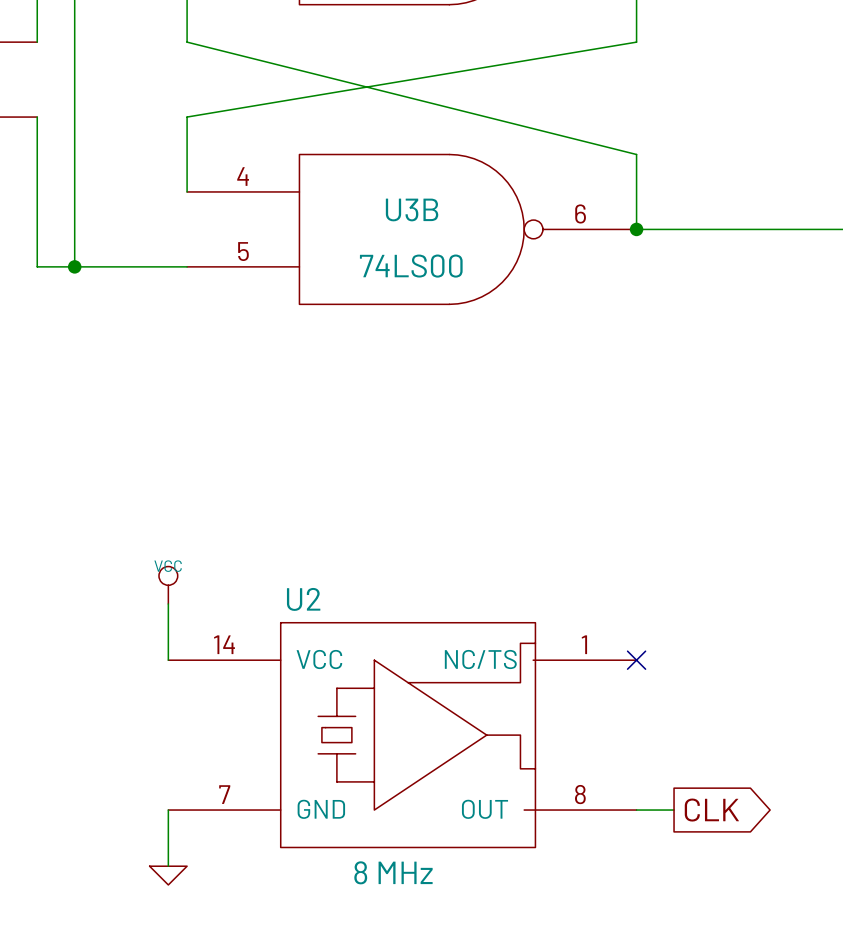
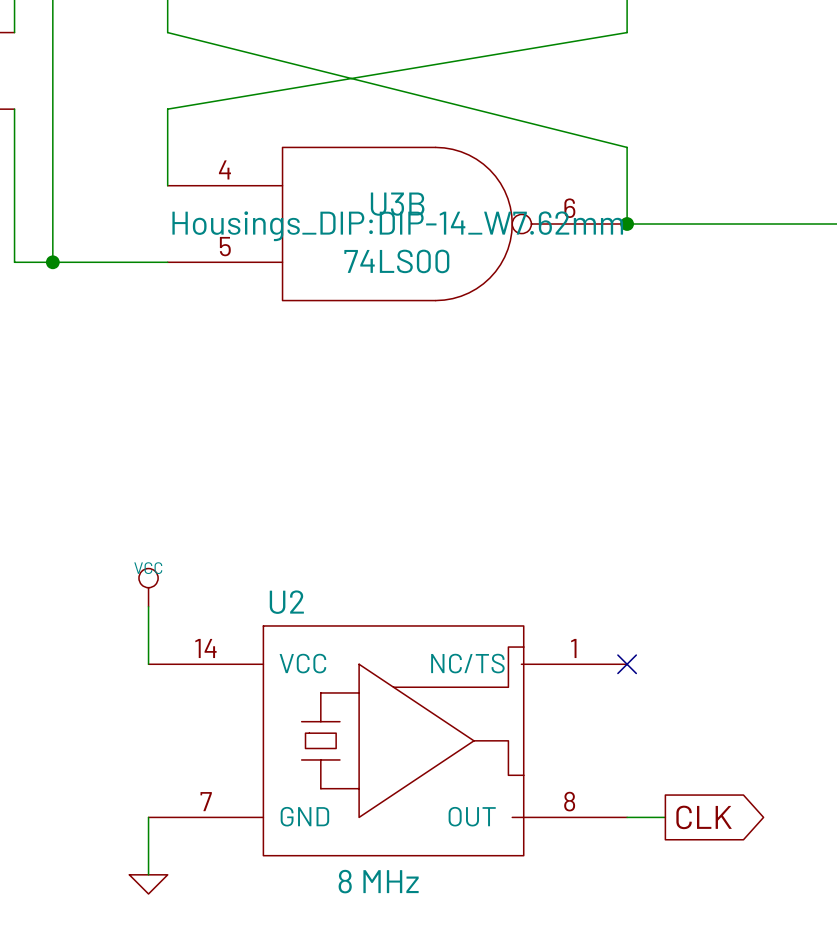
U3B text: none -> Housings_DIP:DIP-14_W7.62mm (397, 226)

